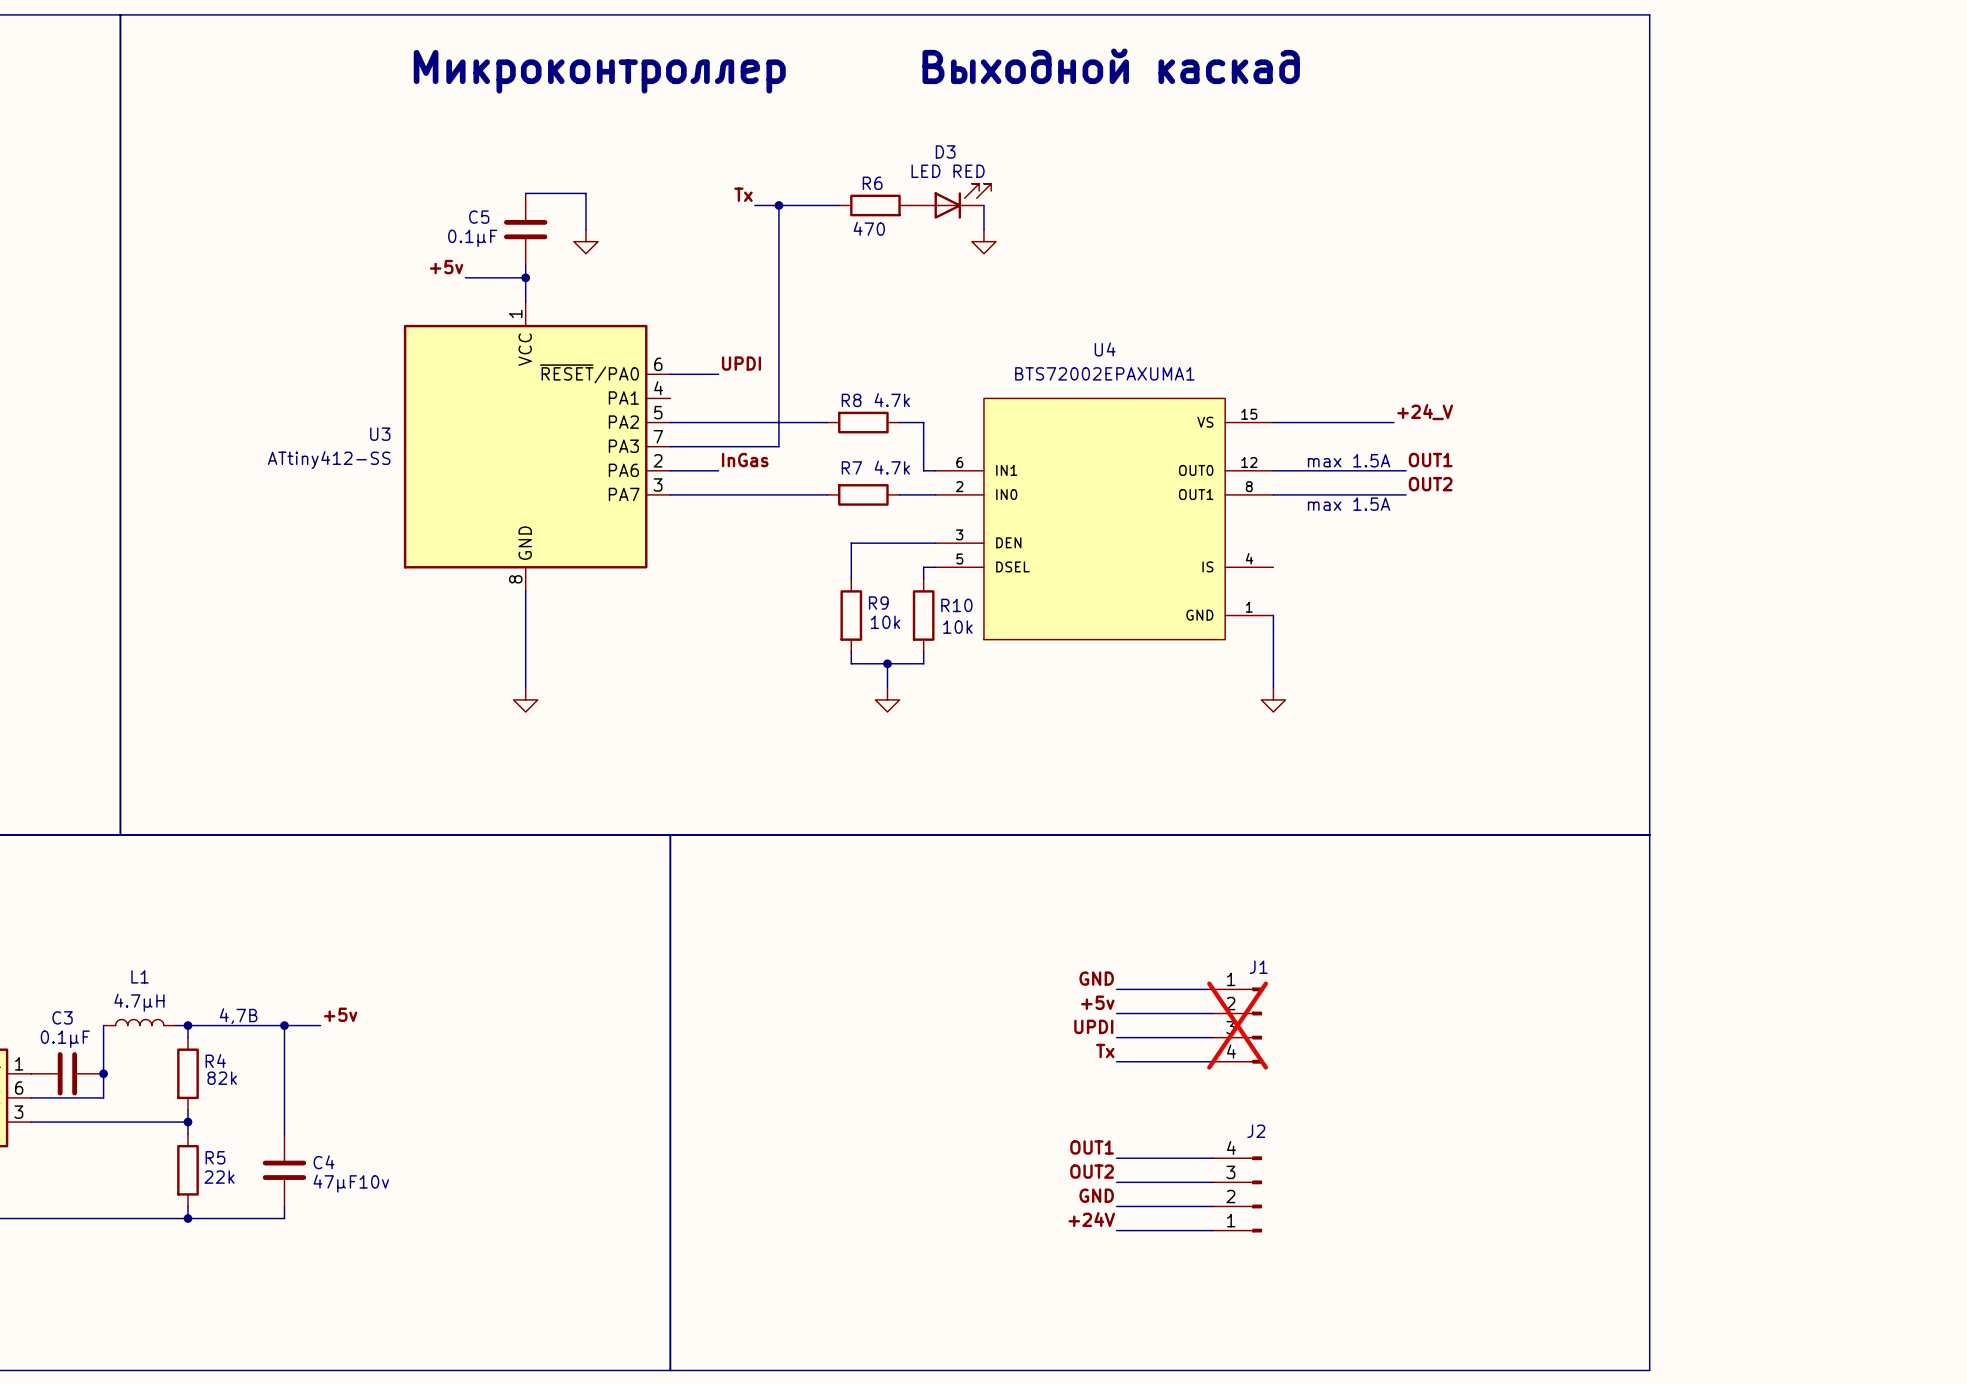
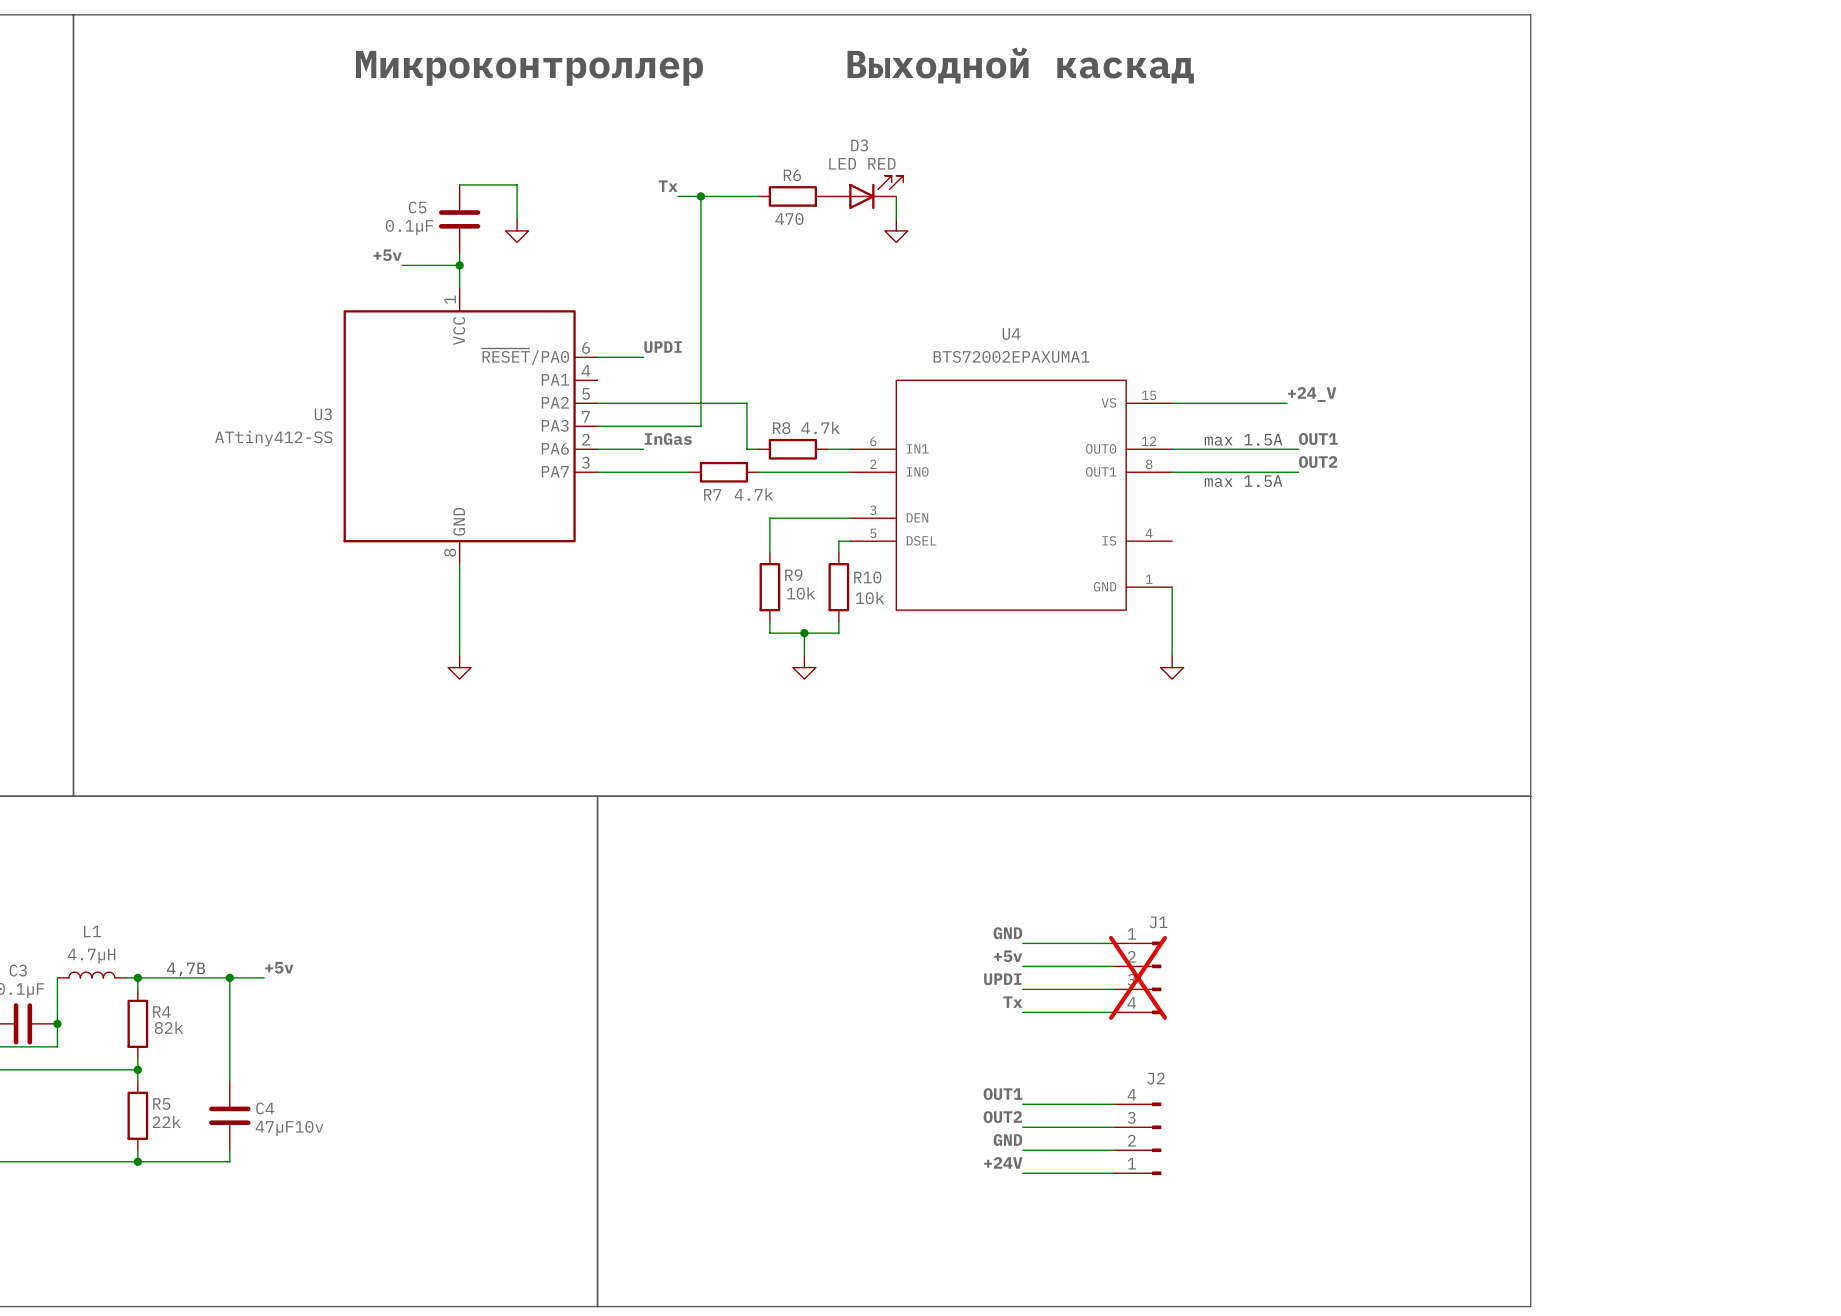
wire: none -> (746, 403) (746, 449) (758, 449)
R8 position: (863, 422) -> (792, 449)
wire: (899, 422) (923, 422) (923, 470) -> (827, 449) (838, 449)
R7 name position: R7 (851, 467) -> R7 (712, 494)
R7 value position: 4.7k (892, 467) -> 4.7k (753, 494)
wire: (766, 494) (827, 494) -> (758, 472) (815, 472)
R7 position: (863, 494) -> (723, 472)

